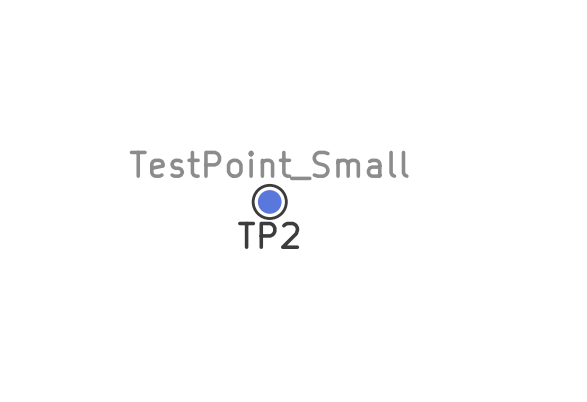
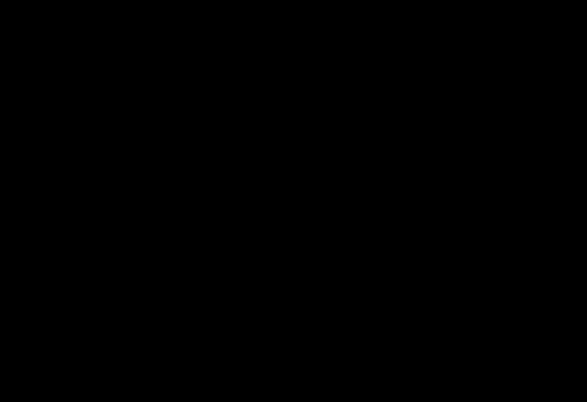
TP2: TestPoint_Small (269, 201) -> none

